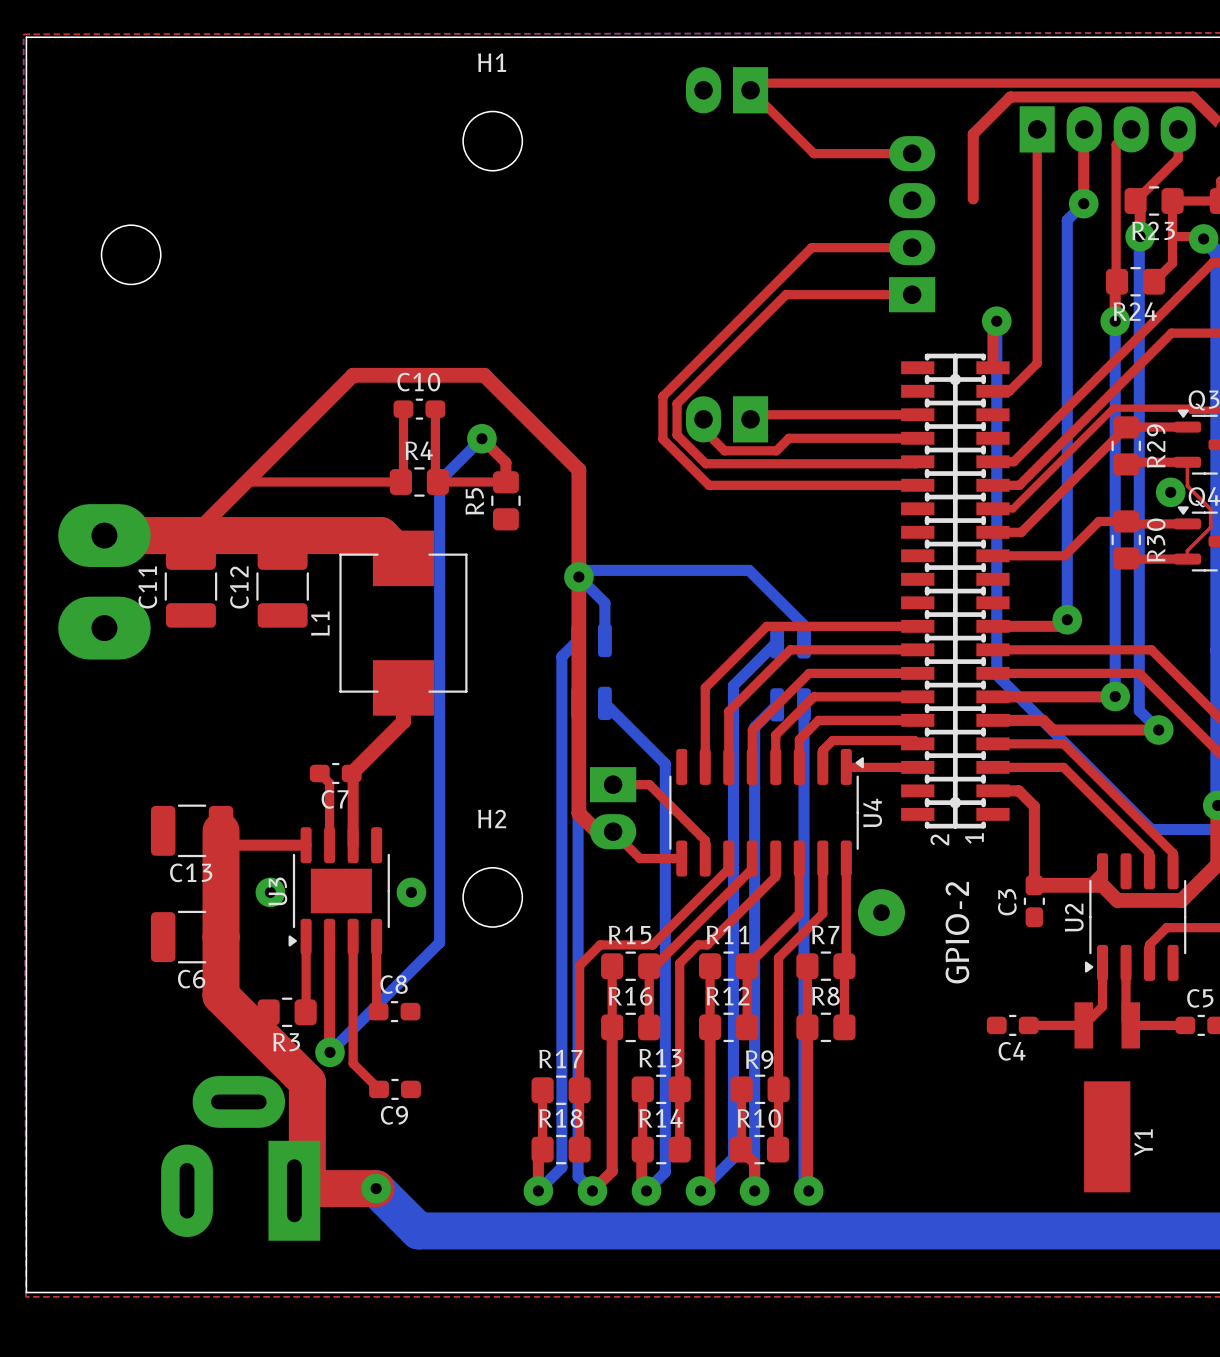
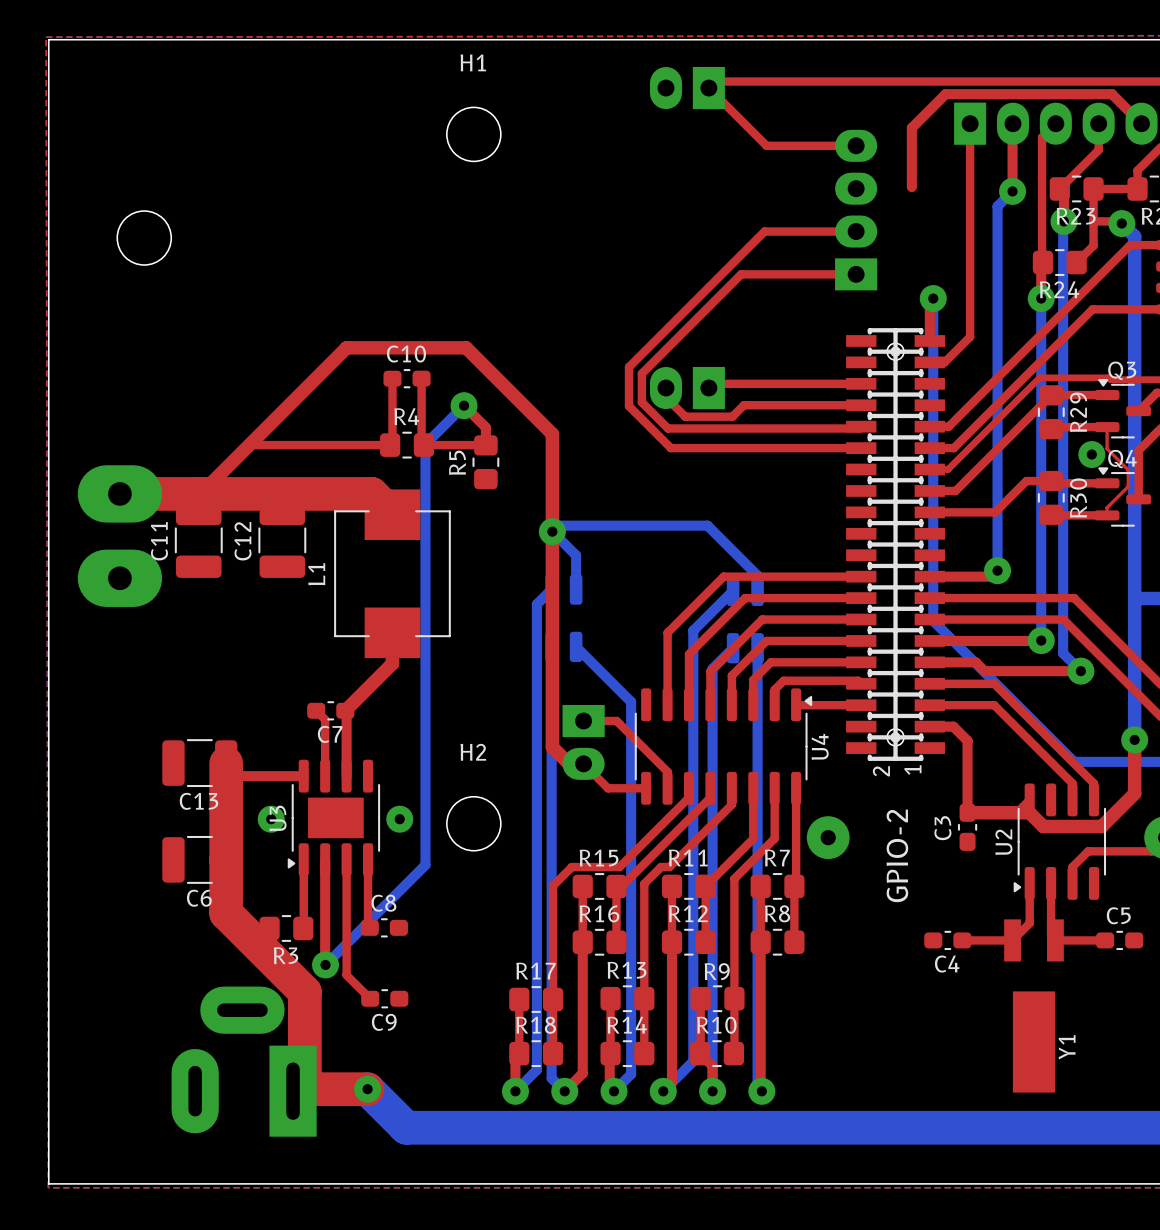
GPIO-2 footprint: [901, 353, 1010, 829] -> [846, 328, 945, 761]

